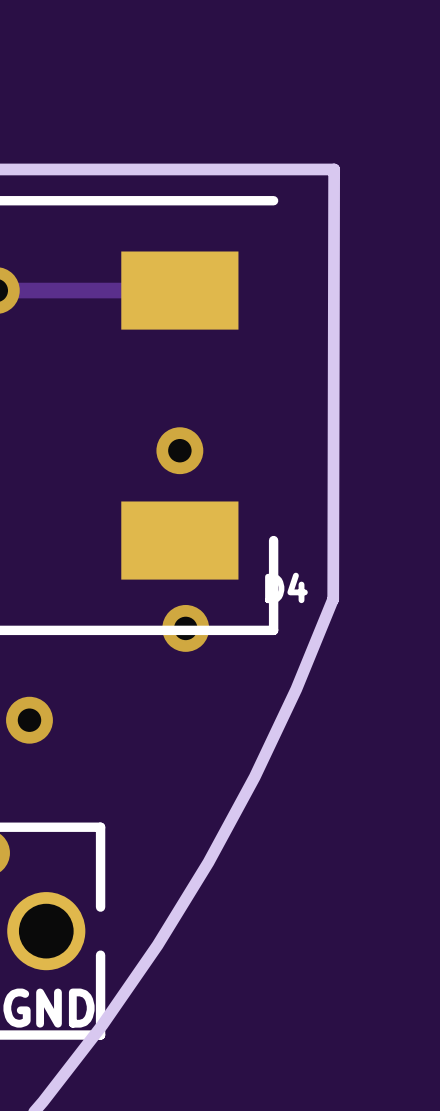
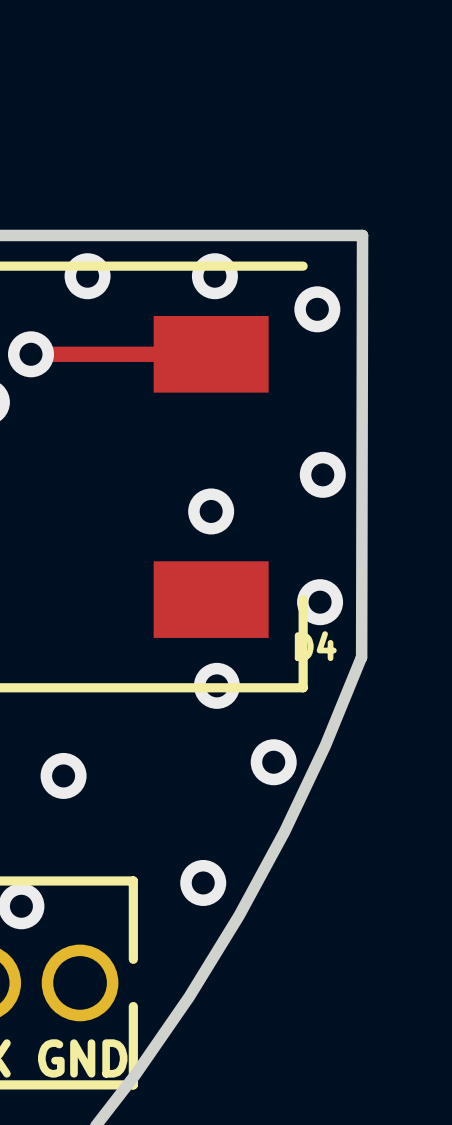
via: none -> (87, 276)
via: none -> (214, 276)
via: none -> (317, 309)
via: none -> (322, 474)
via: none -> (320, 602)
via: none -> (273, 762)
via: none -> (203, 882)

